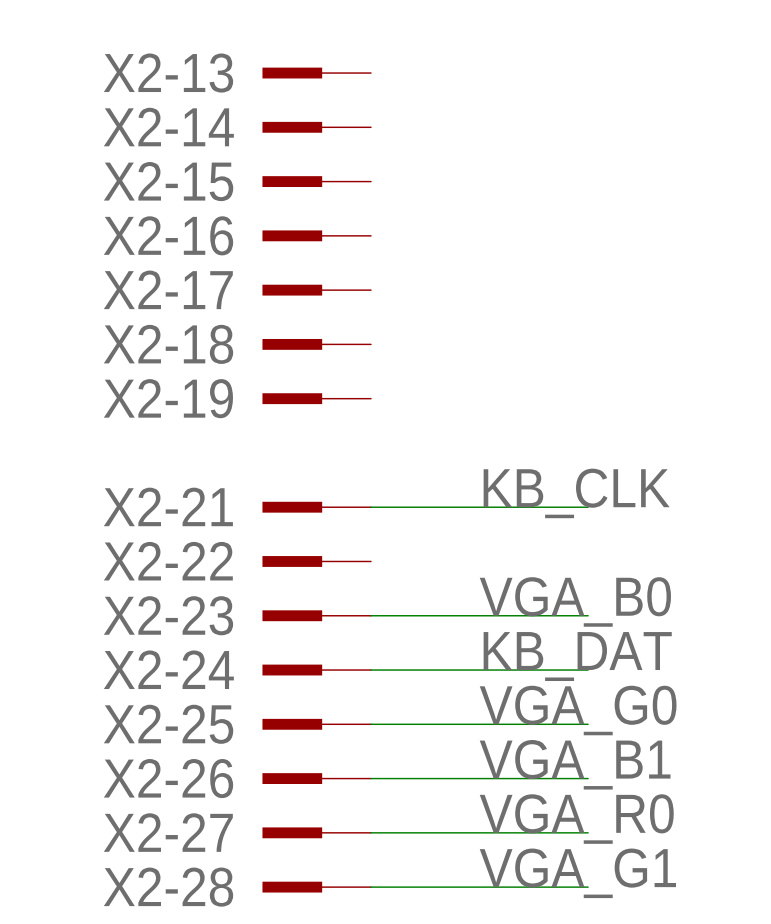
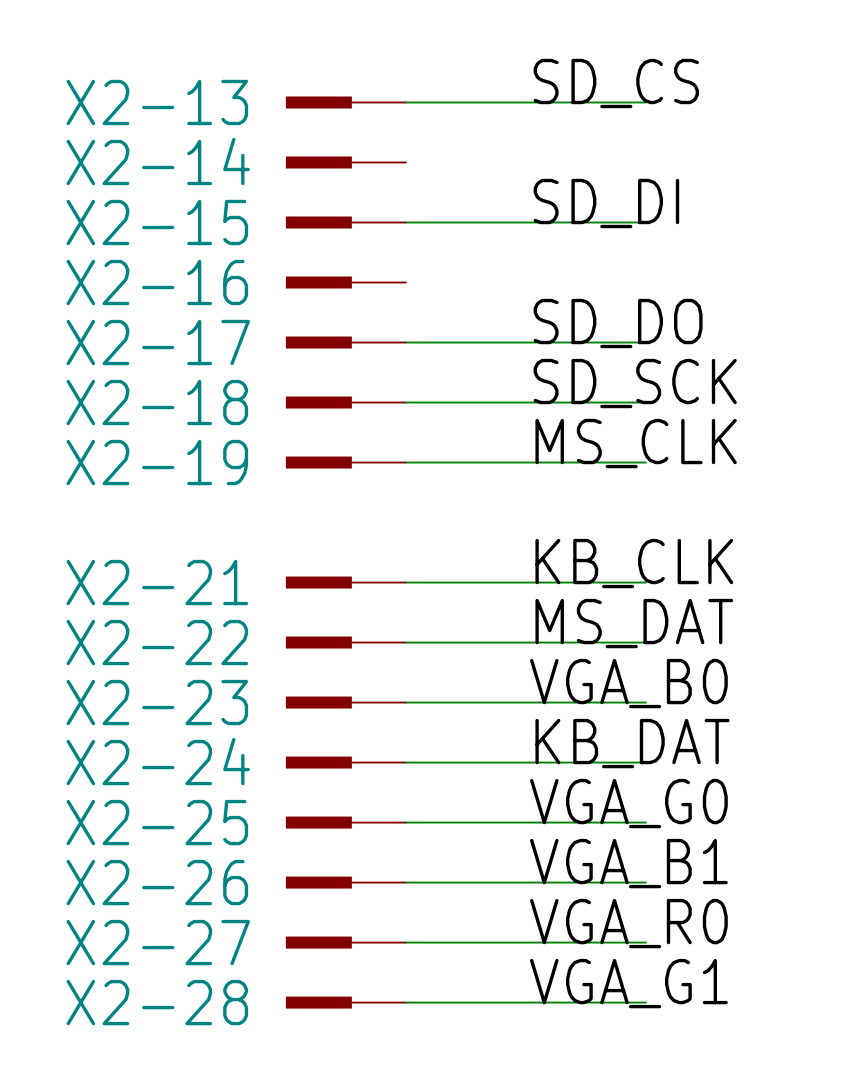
label: none -> SD_CS (616, 83)
wire: none -> (405, 102) (645, 102)
label: none -> SD_DI (606, 203)
wire: none -> (405, 222) (645, 222)
label: none -> SD_DO (618, 323)
wire: none -> (405, 342) (645, 342)
label: none -> SD_SCK (635, 383)
wire: none -> (405, 402) (645, 402)
label: none -> MS_CLK (636, 443)
wire: none -> (405, 462) (645, 462)
label: none -> MS_DAT (634, 623)
wire: none -> (405, 642) (645, 642)

